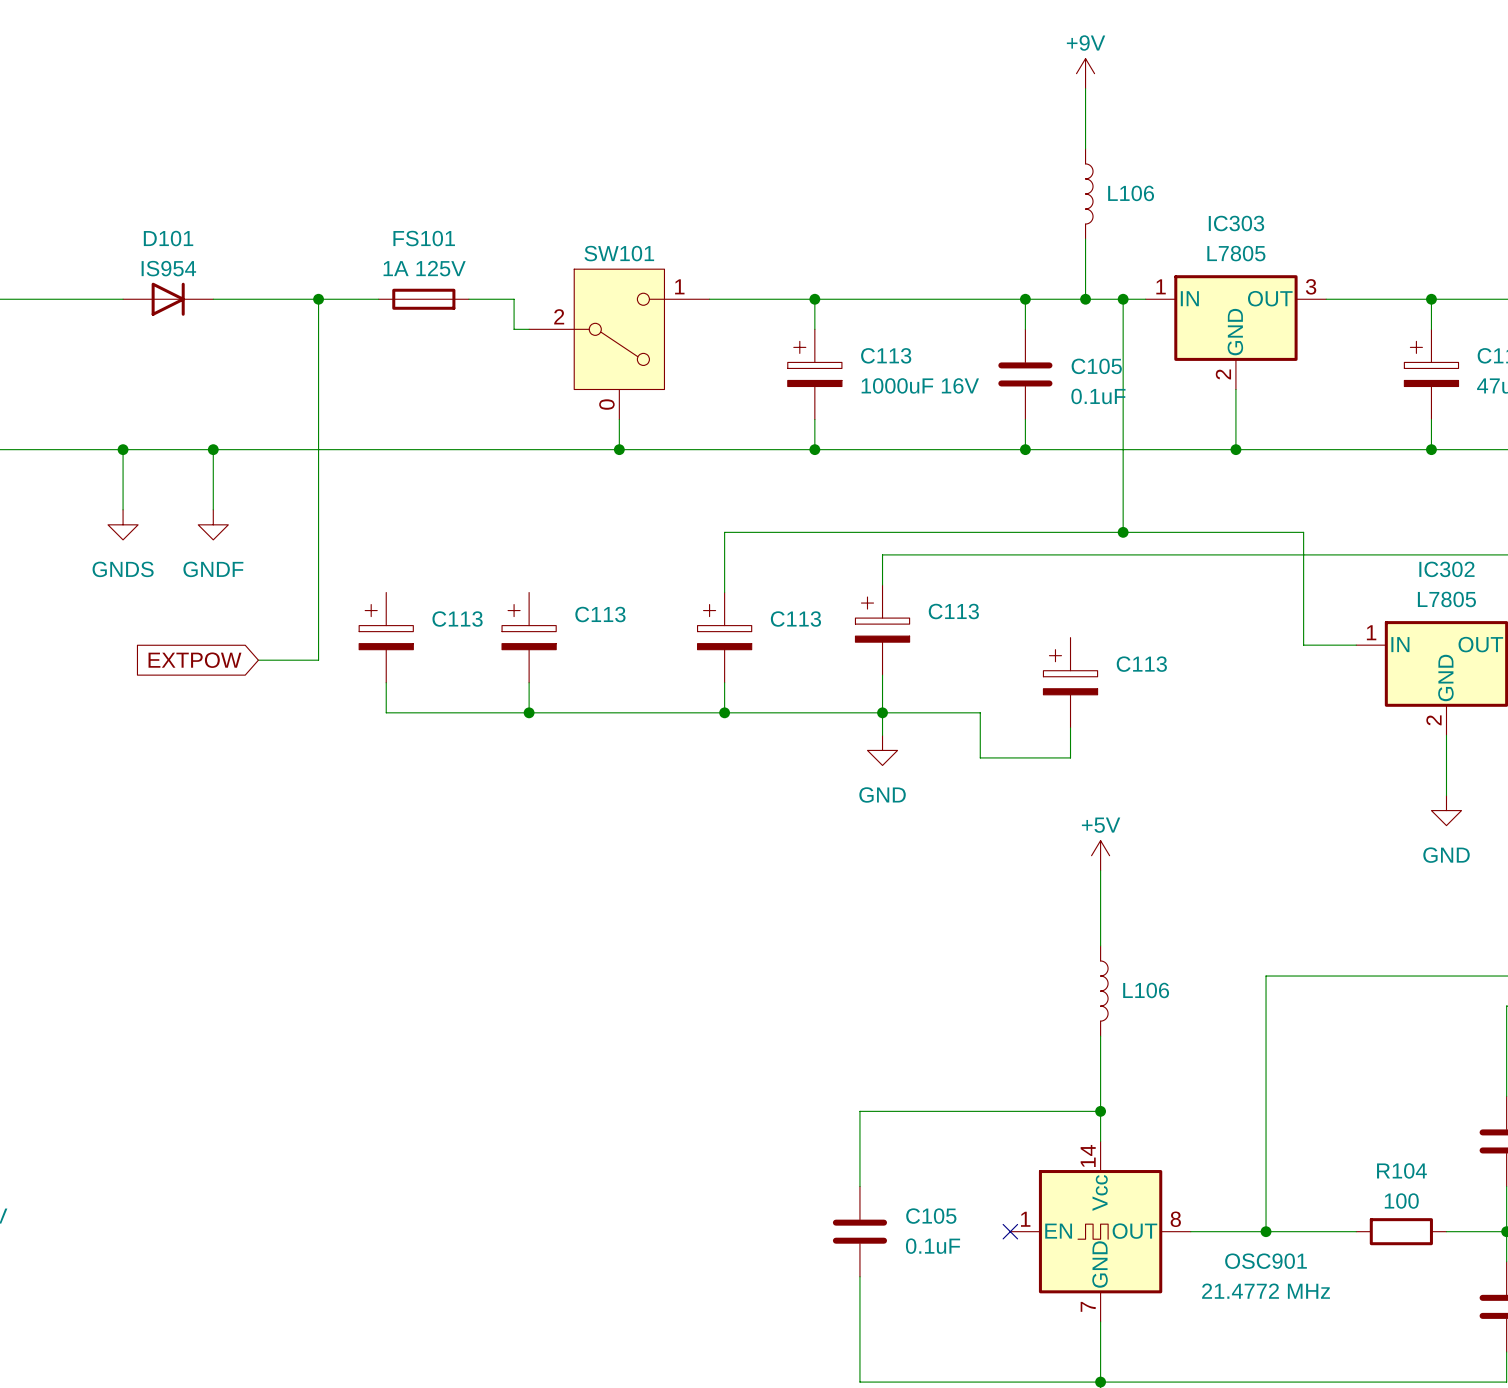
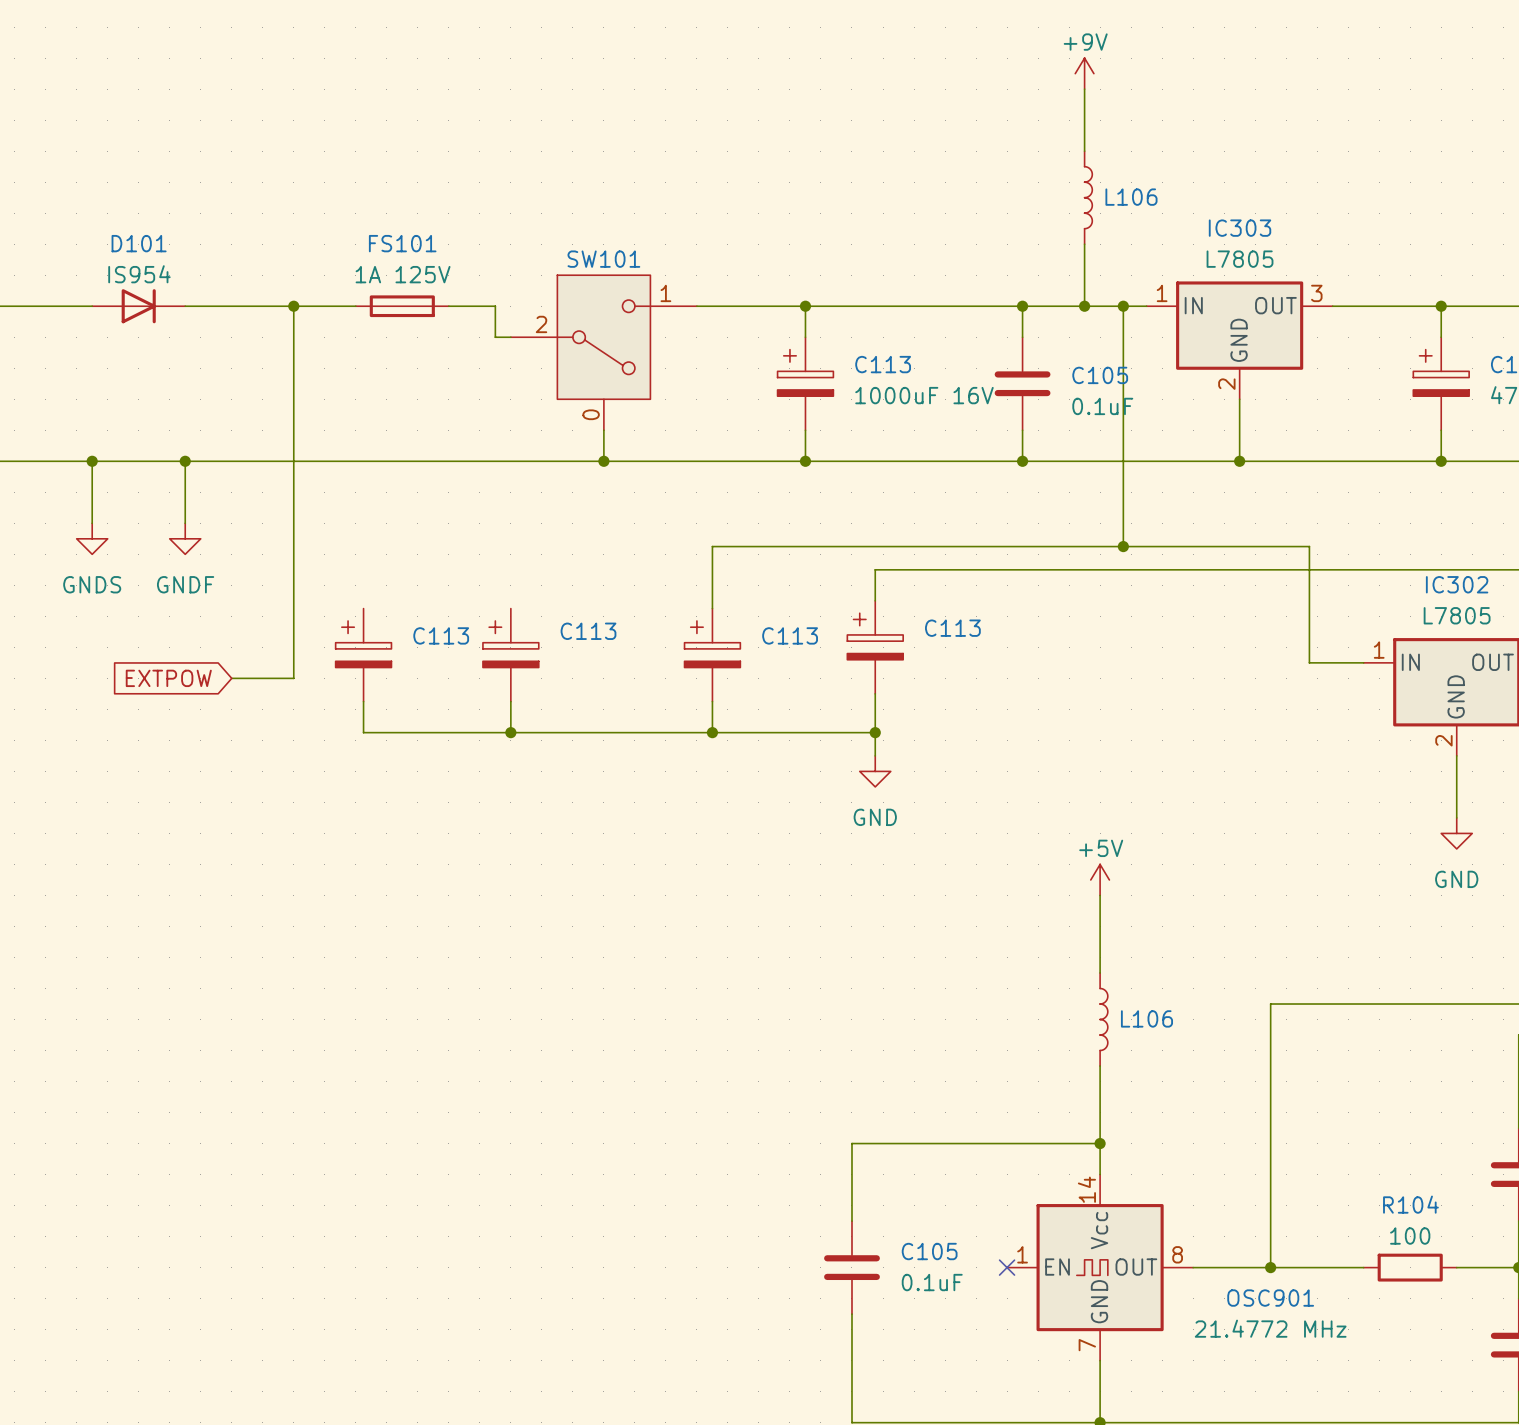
C113: (1070, 682) -> none
wire: (882, 712) (980, 712) (980, 757) (1070, 757) (1070, 727) -> none

